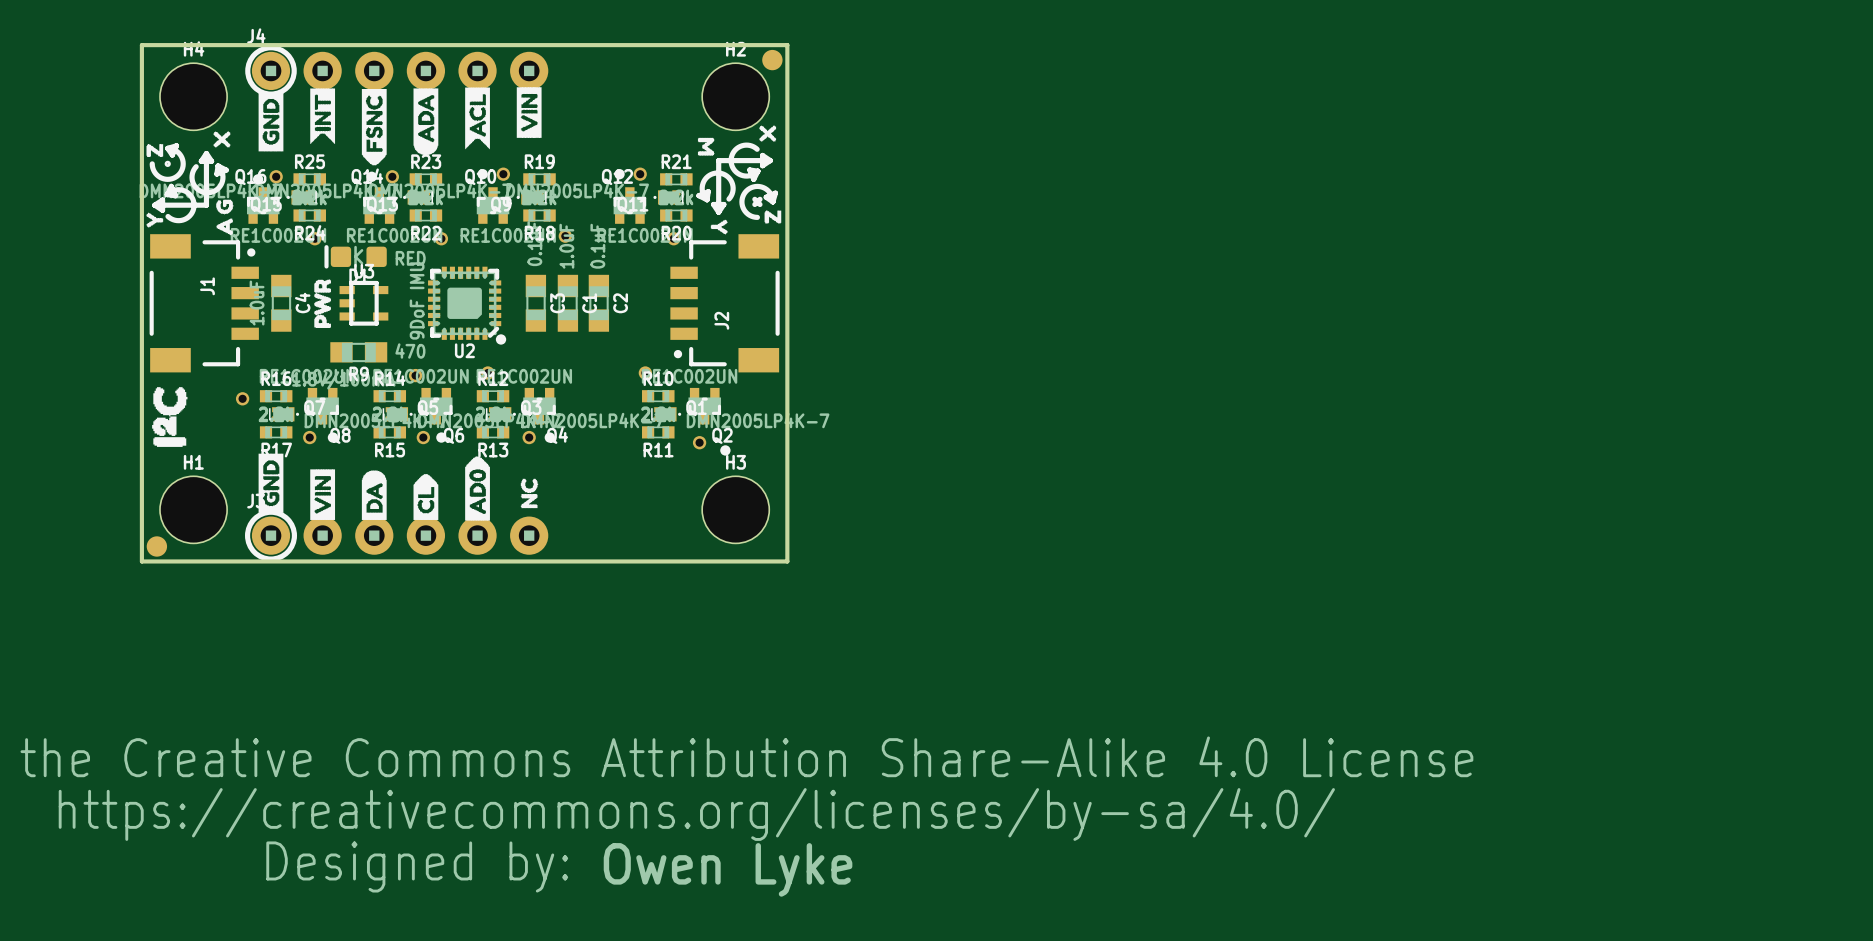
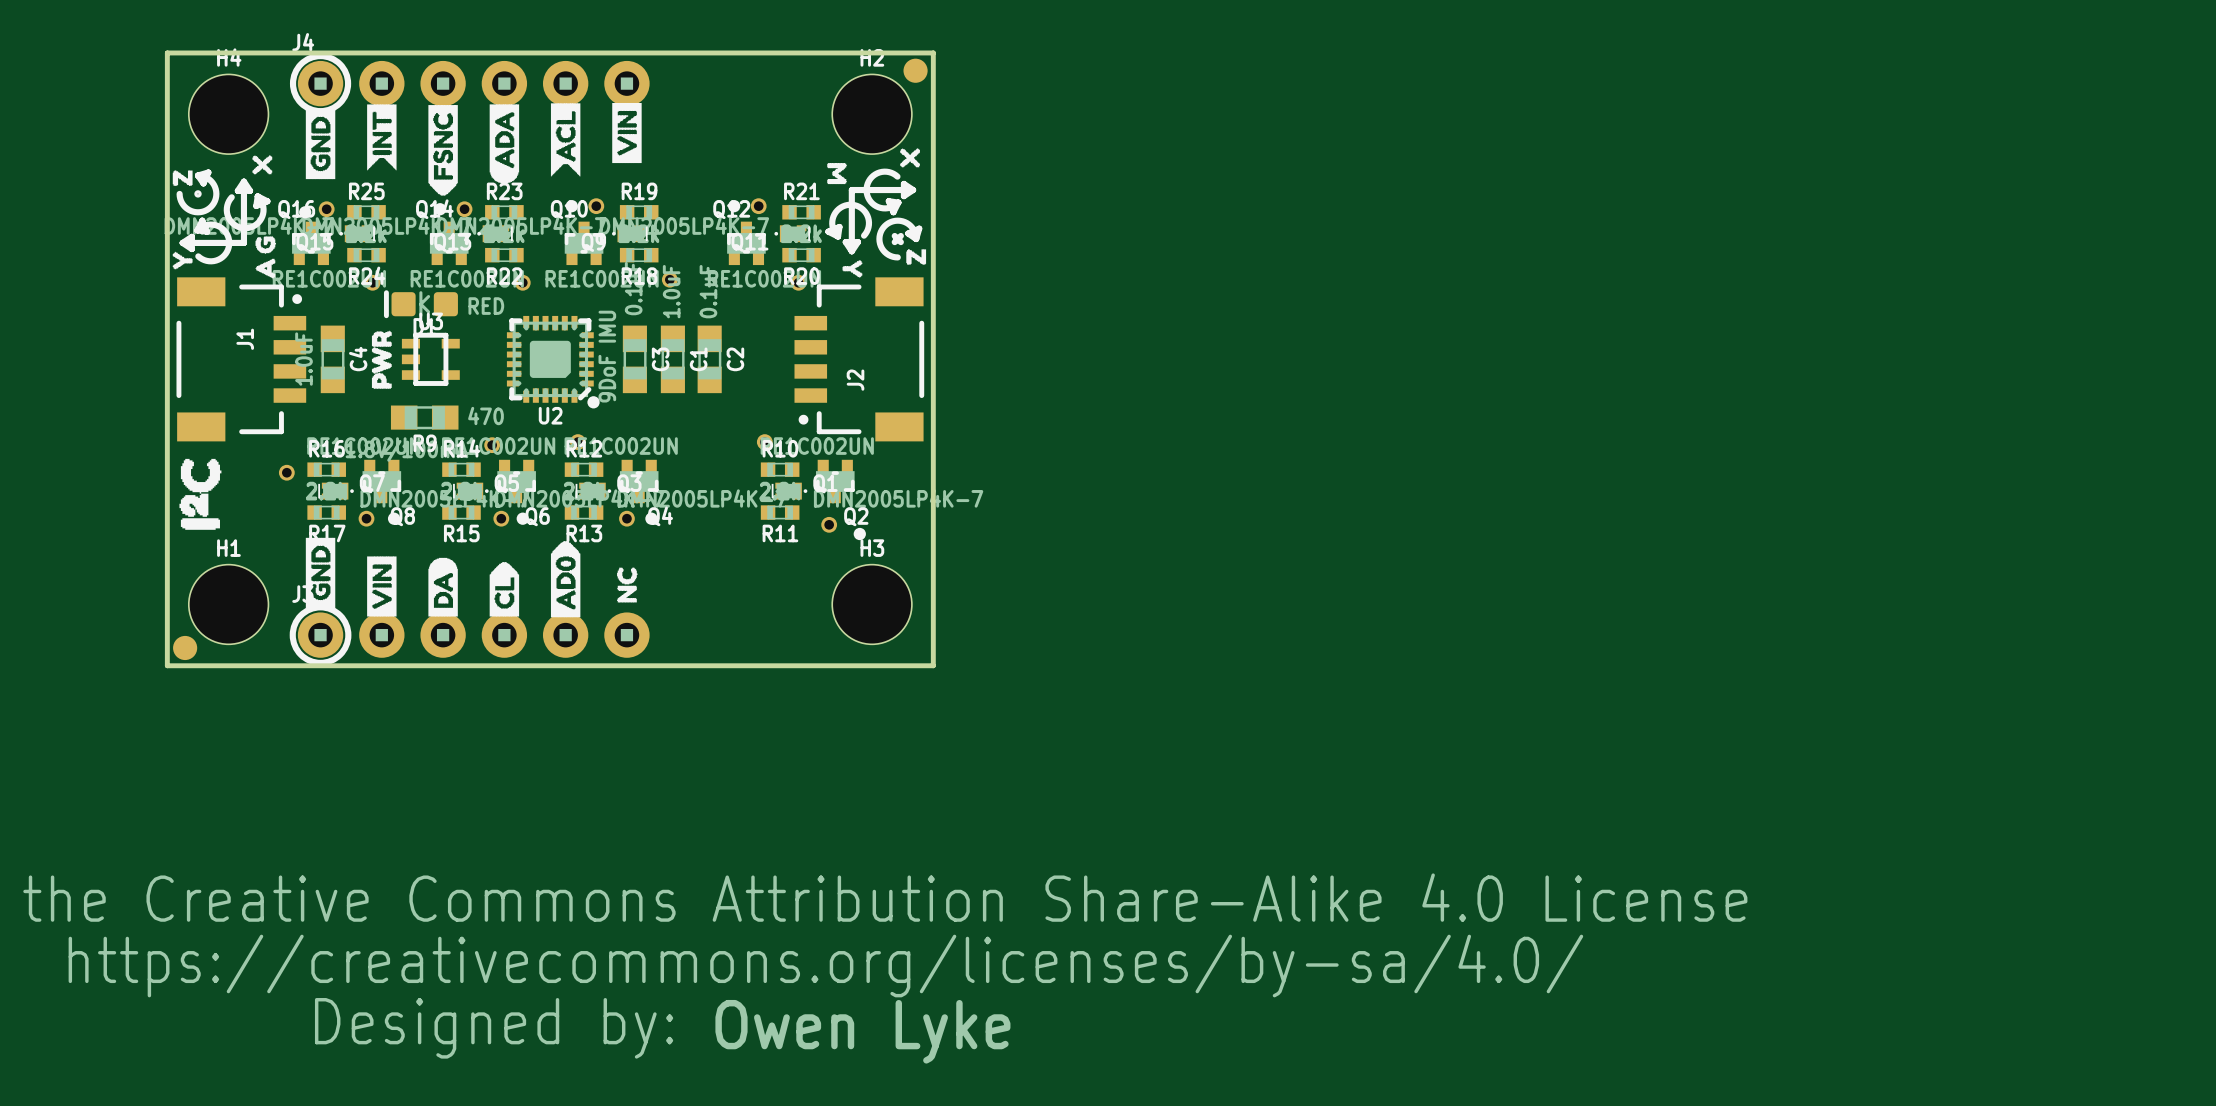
U2 value position: 9DoF IMU (417, 300) -> 9DoF IMU (607, 356)

